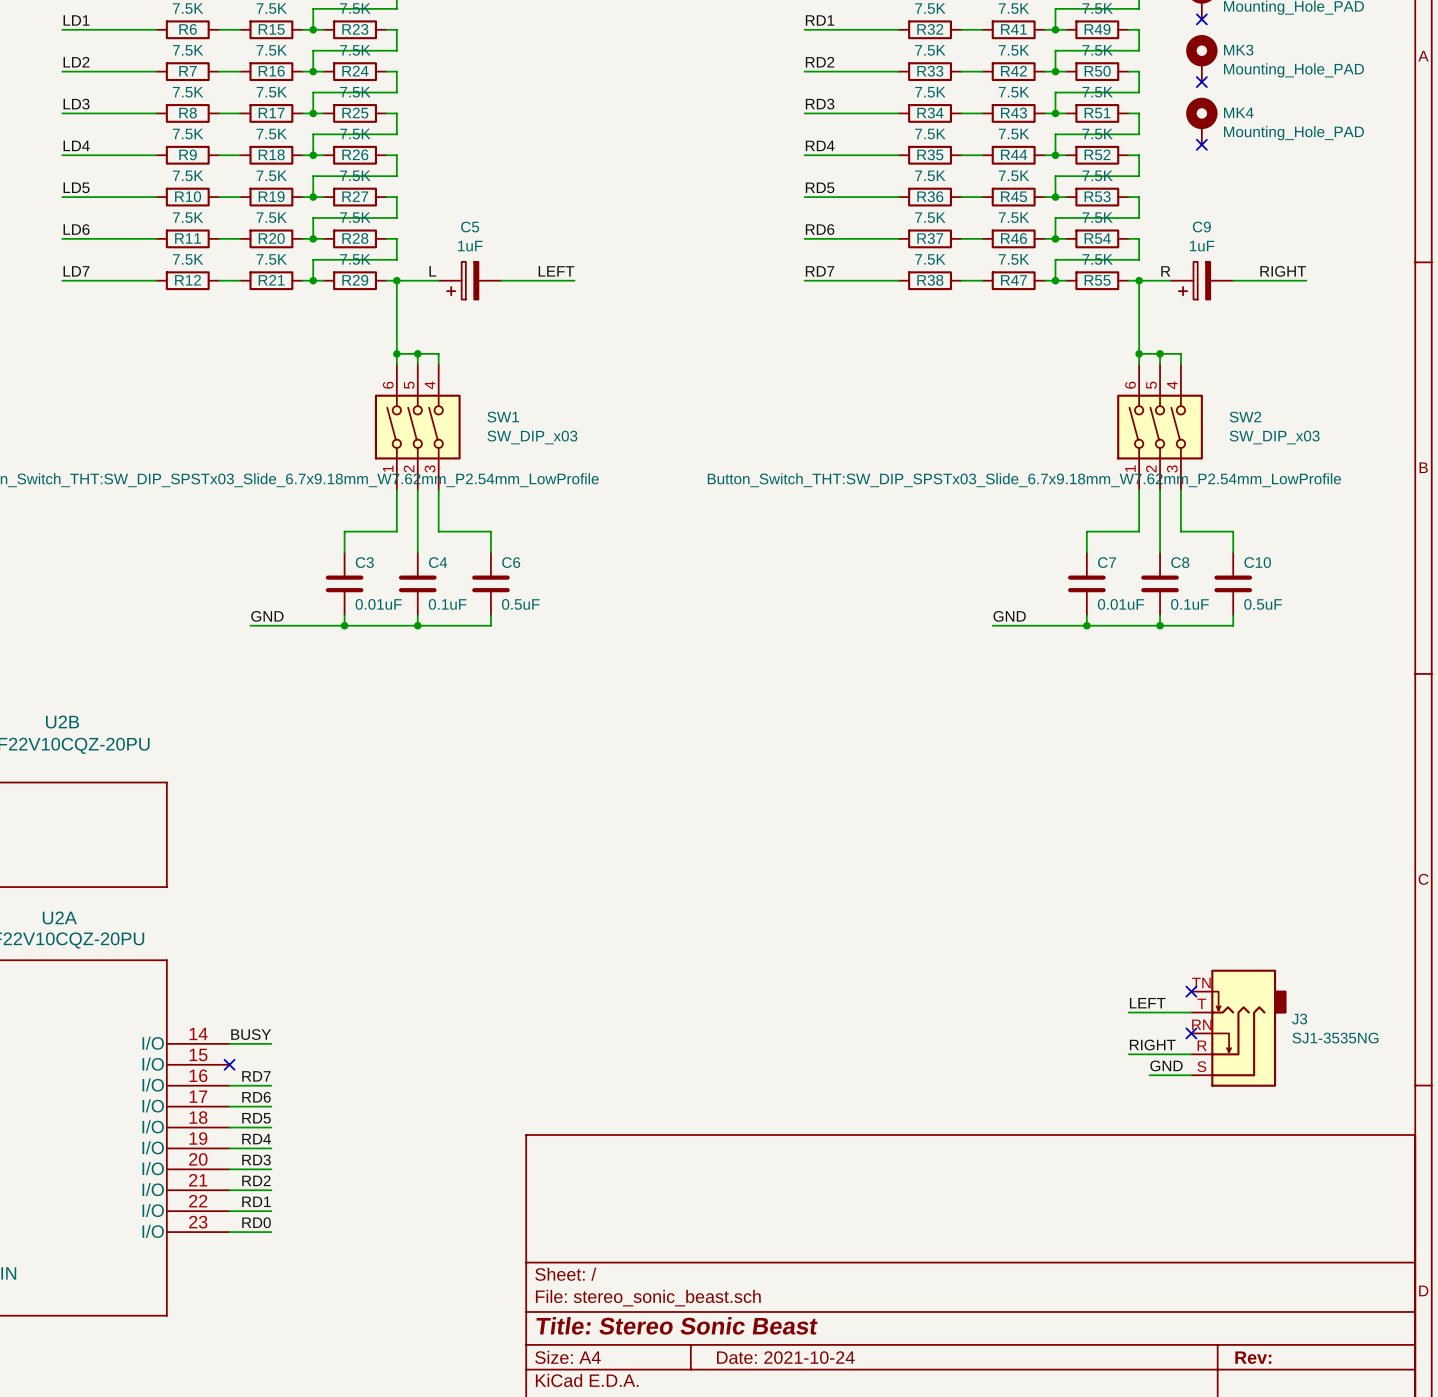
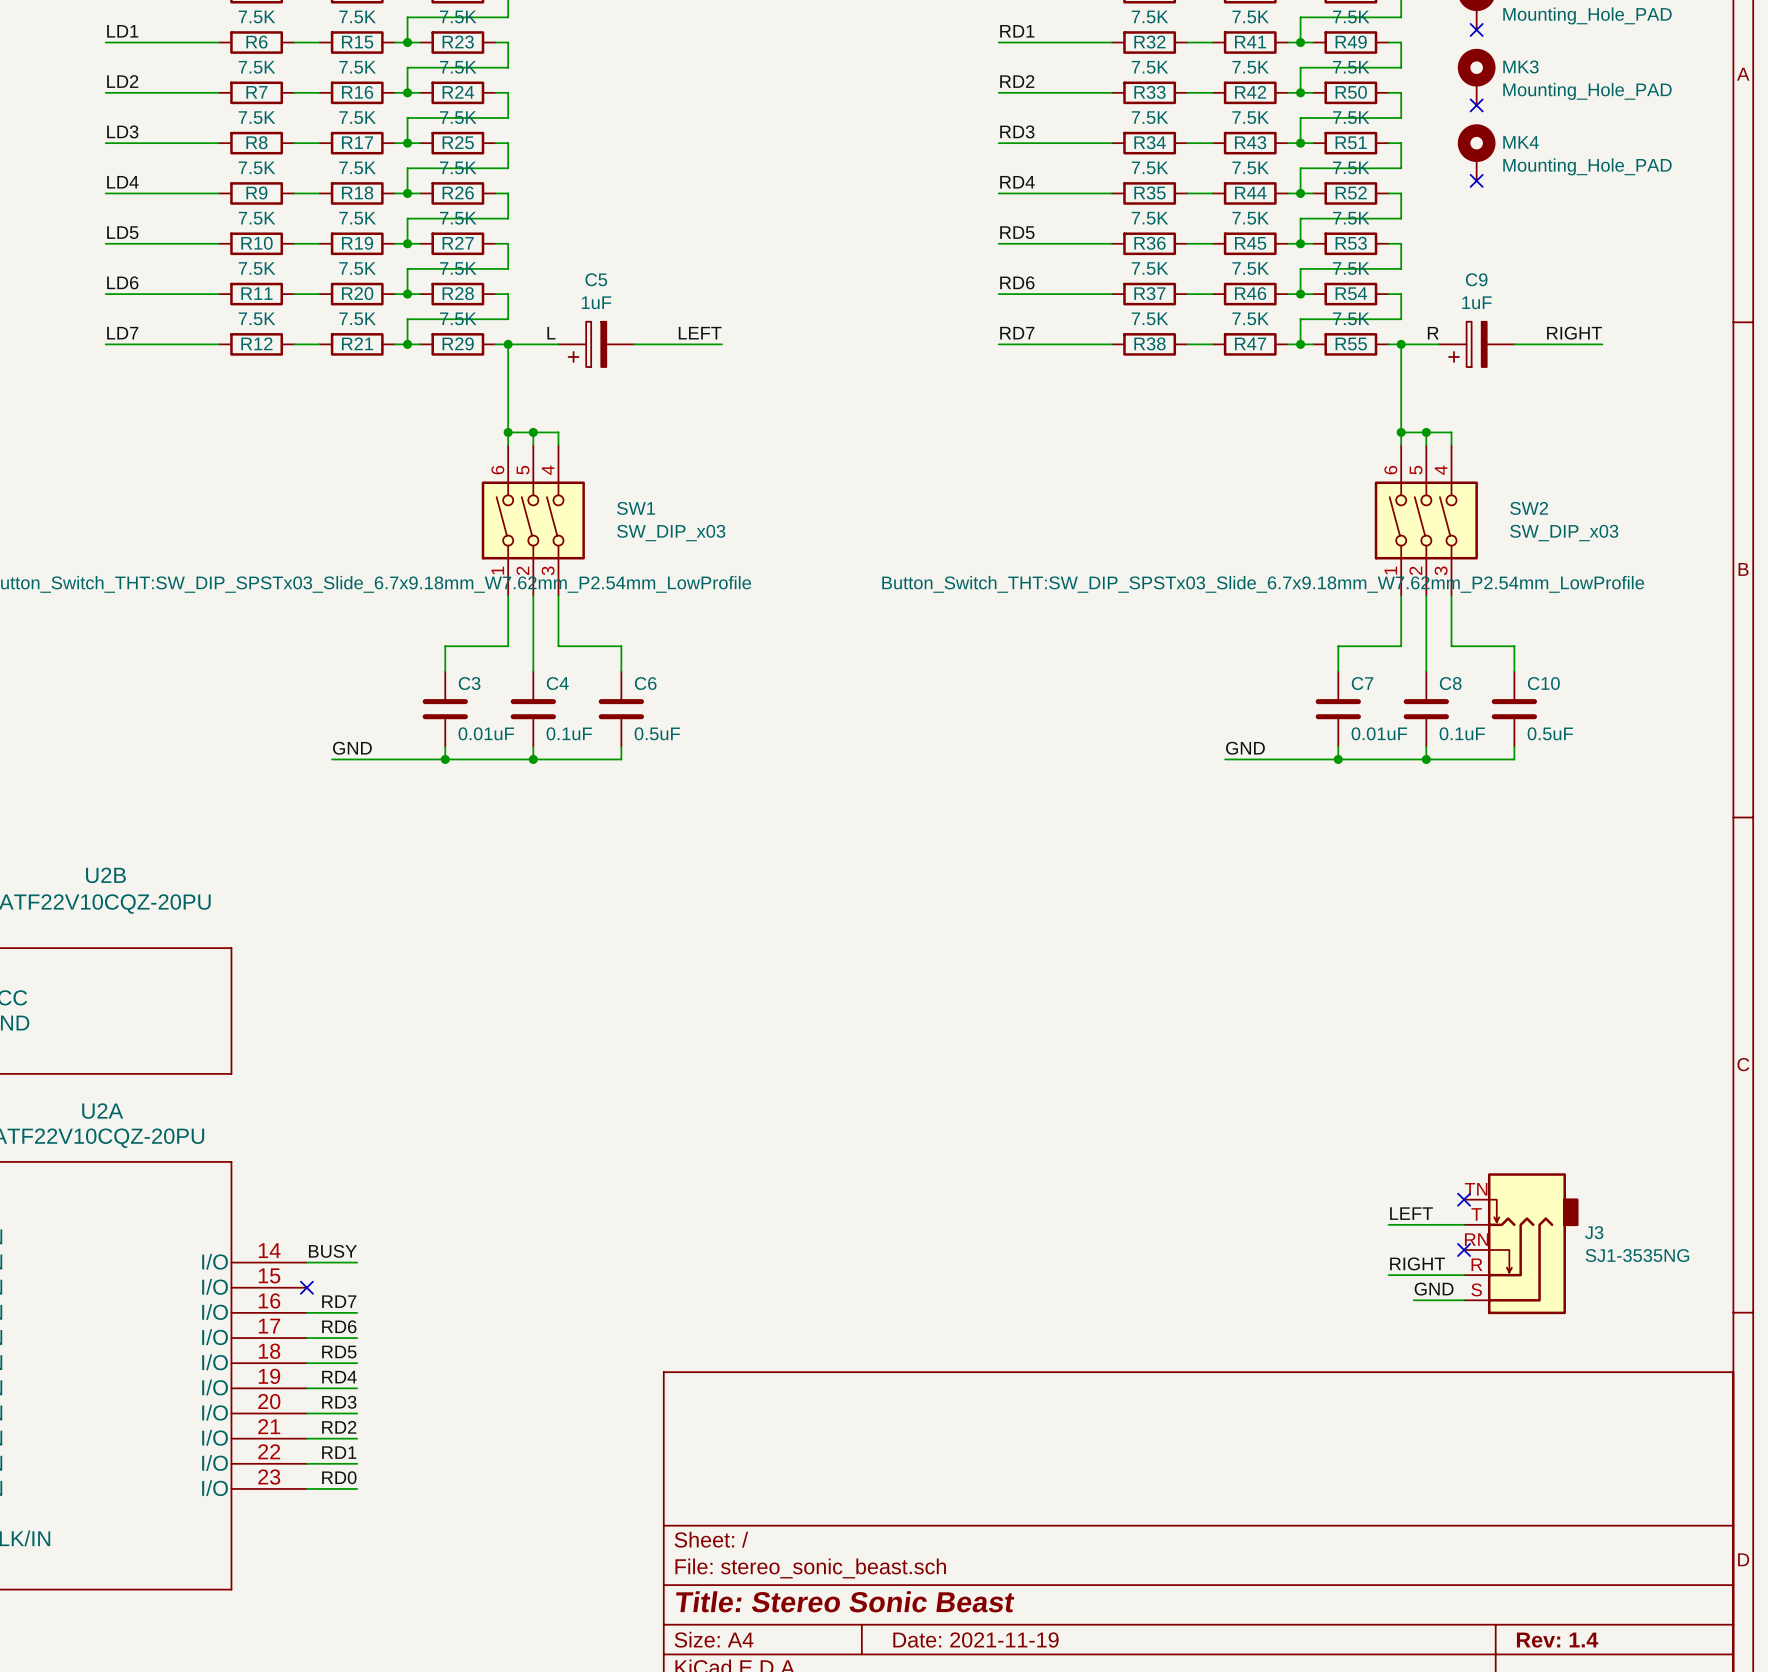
title block: Date: 2021-10-24 (785, 1357) -> Date: 2021-11-19 (975, 1640)
title block: Rev: (1253, 1357) -> Rev: 1.4 (1557, 1640)

